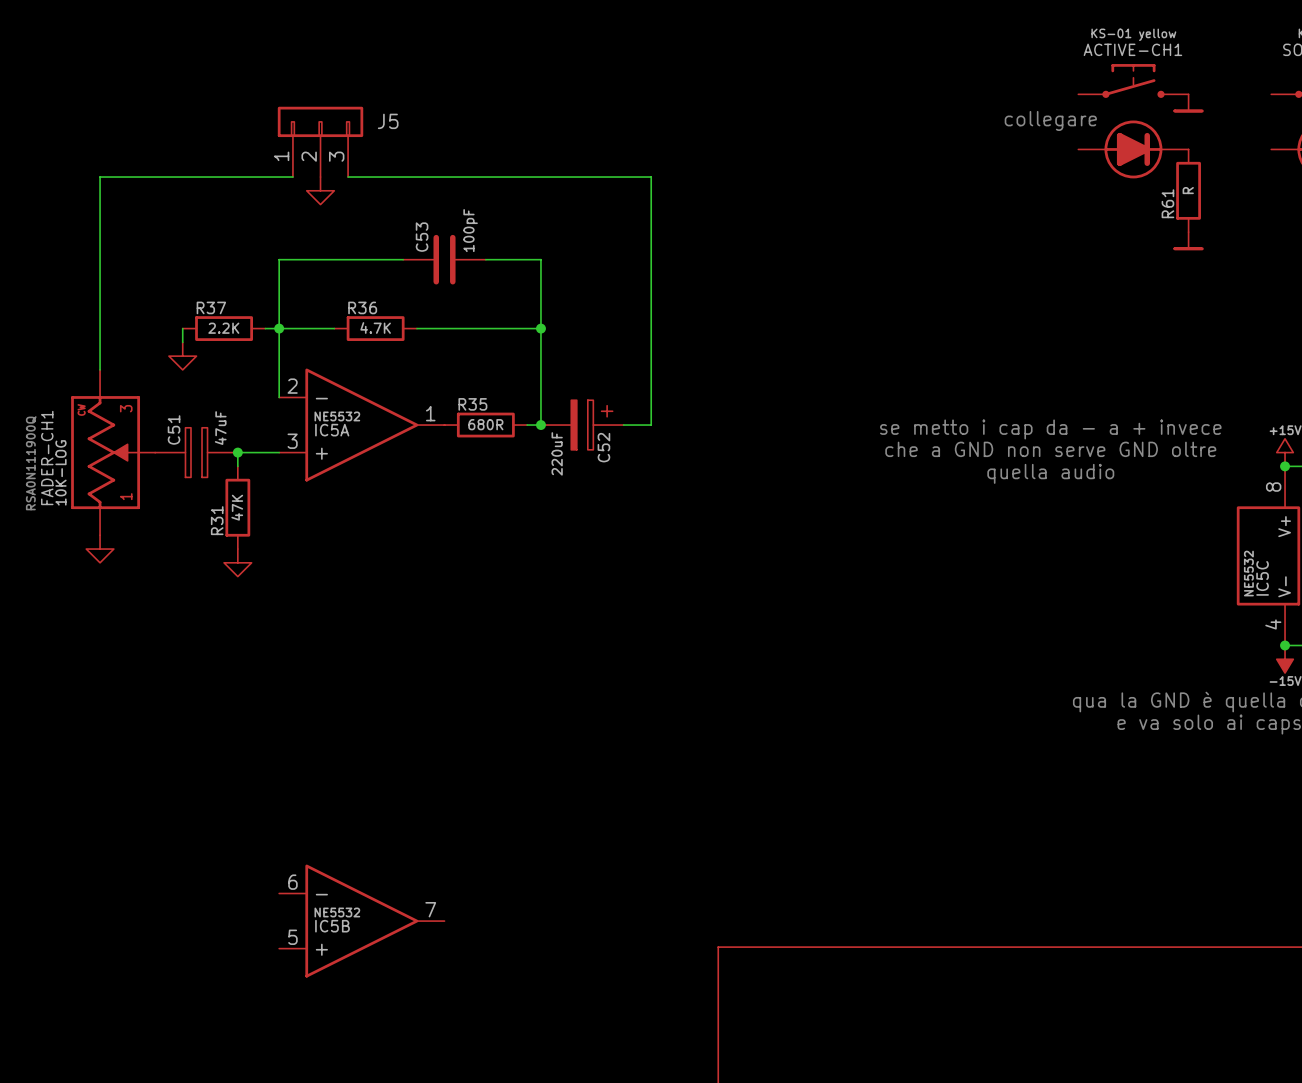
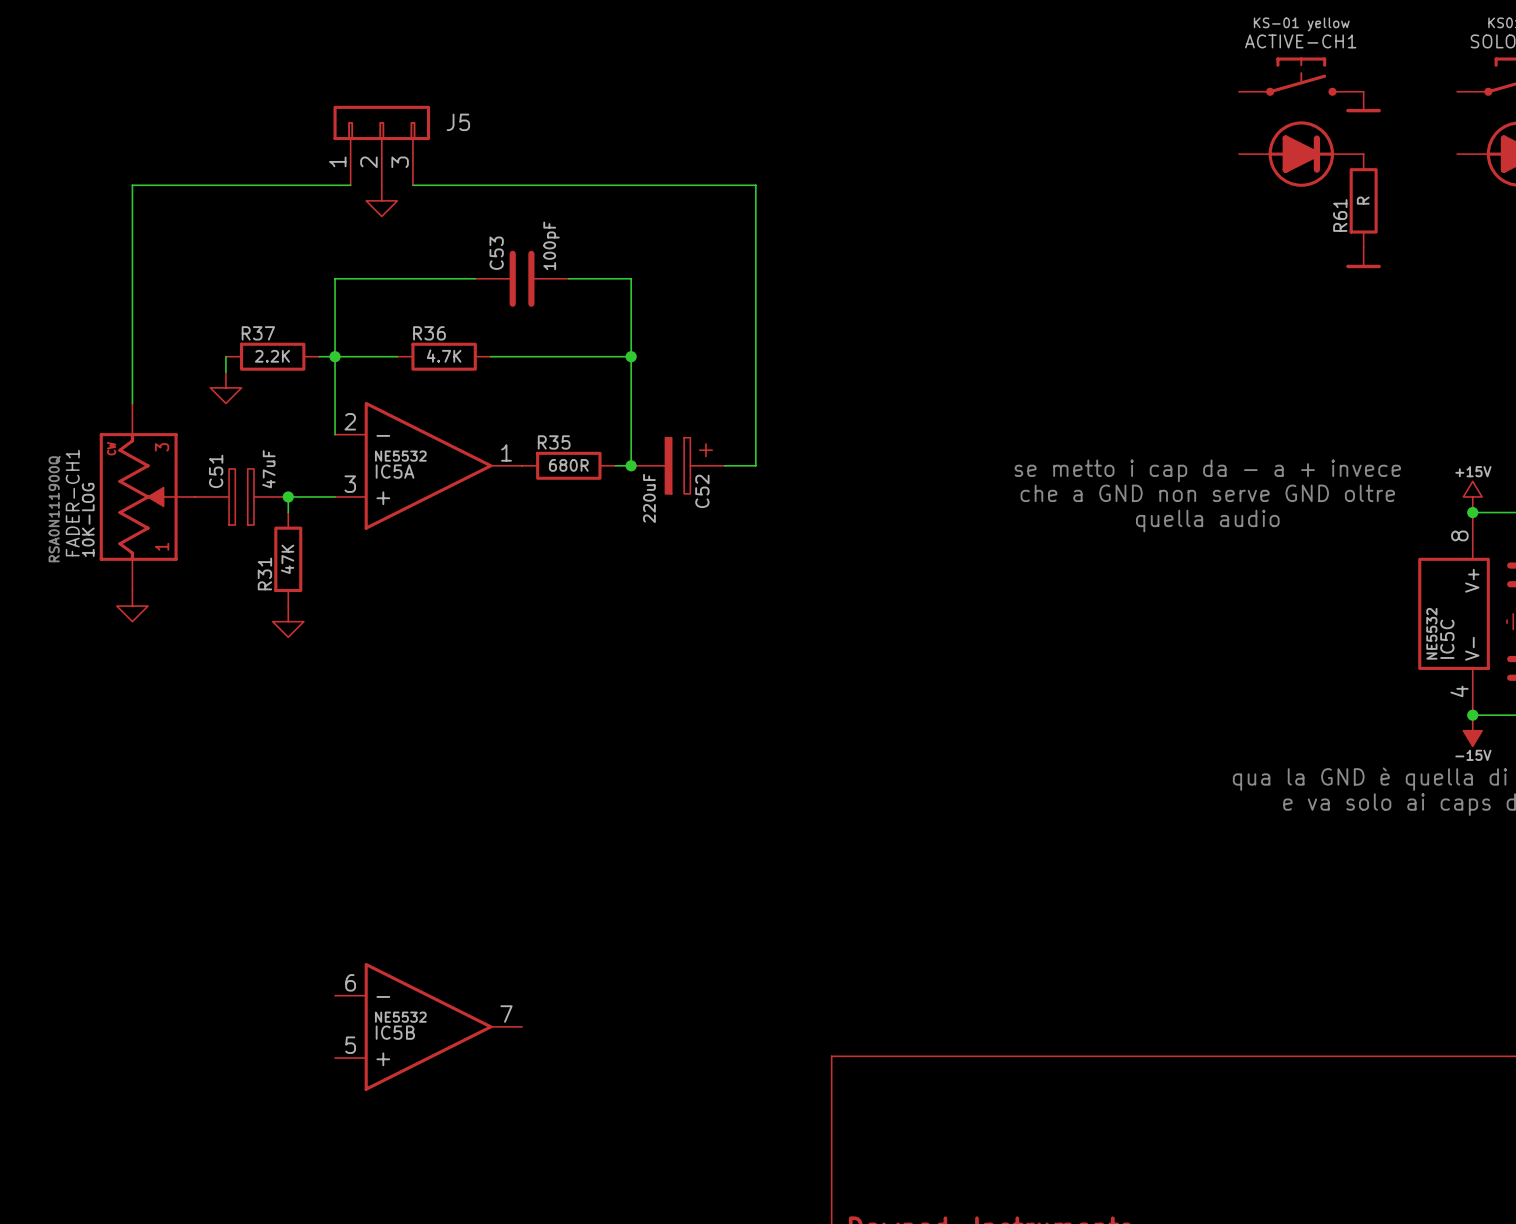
text: collegare (1050, 120) -> none

